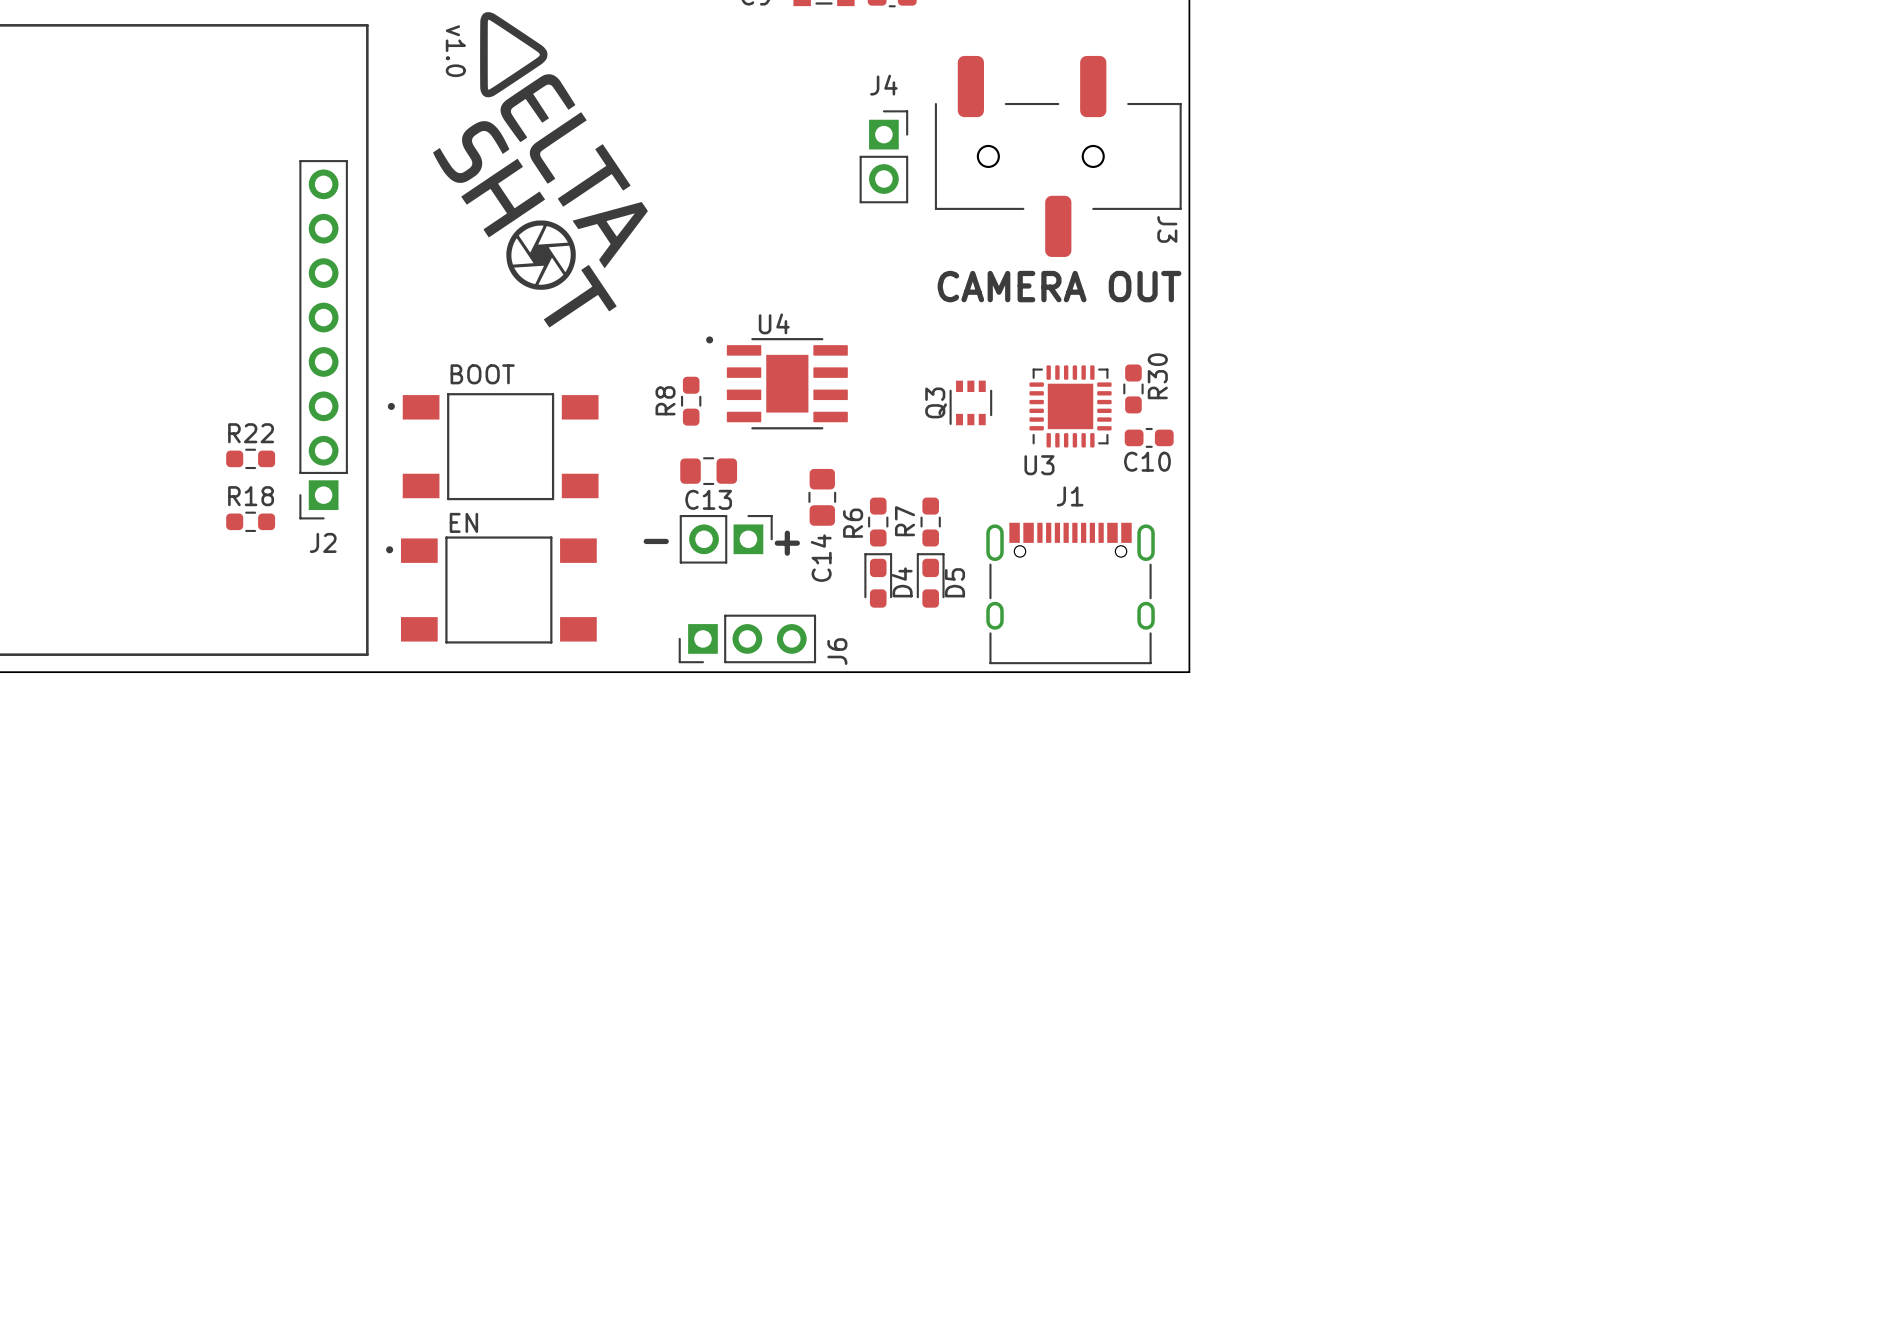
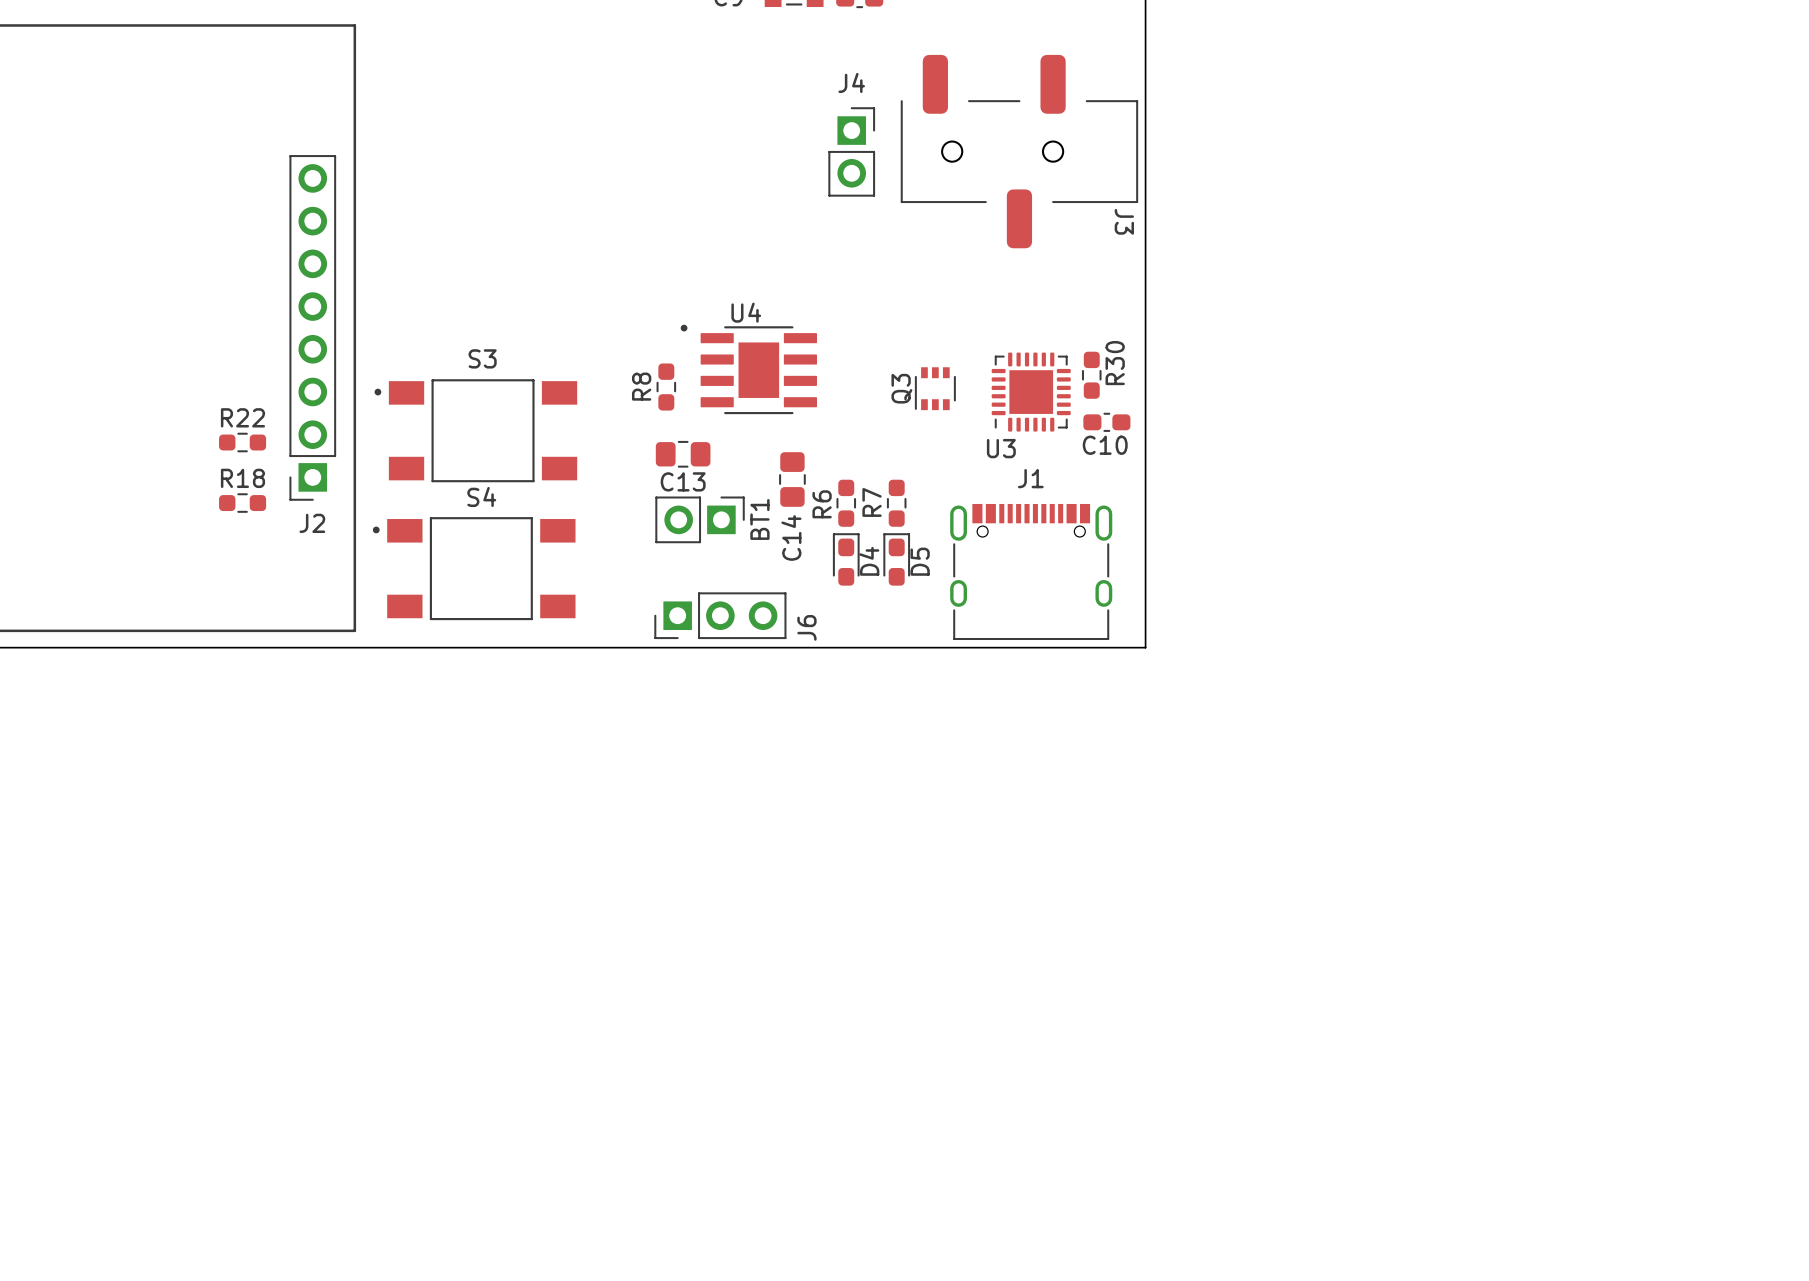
drawing: [433, 12, 648, 328] -> none
text: v1.0 (455, 51) -> none
text: CAMERA OUT (1059, 286) -> none
S3 name: none -> S3 (482, 358)
text: BOOT (482, 374) -> none
S4 name: none -> S4 (481, 496)
text: EN (463, 522) -> none
BT1 name: none -> BT1 (759, 519)
text: - (656, 541) -> none
text: + (787, 543) -> none

